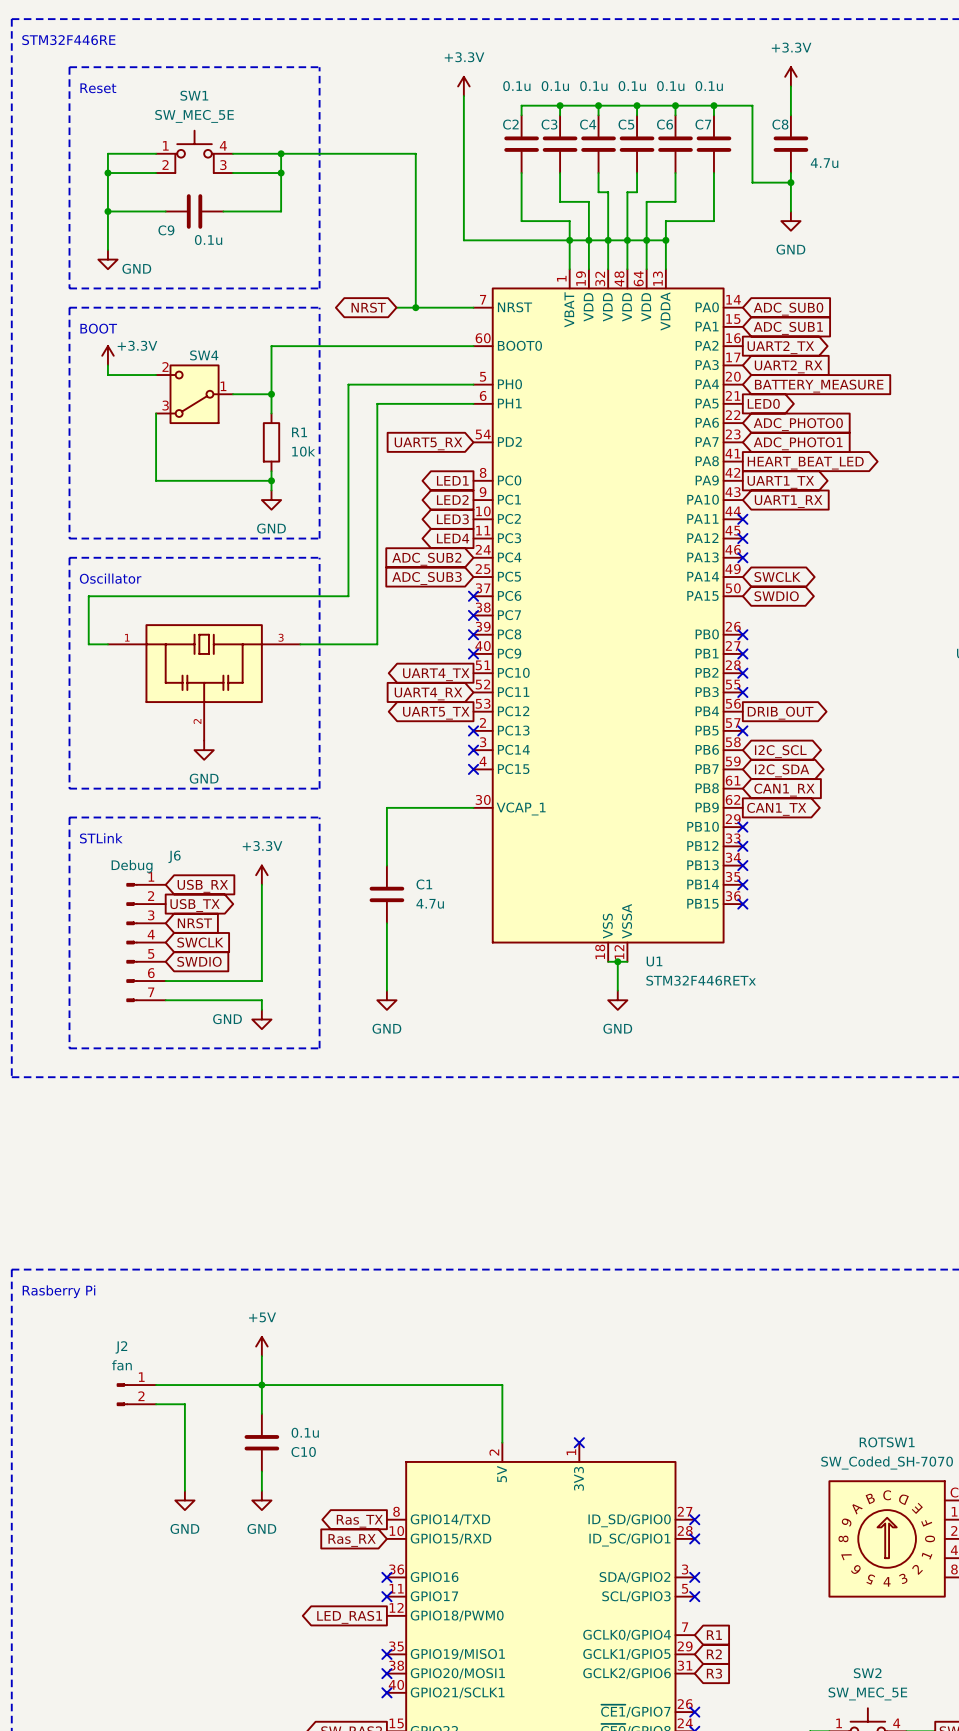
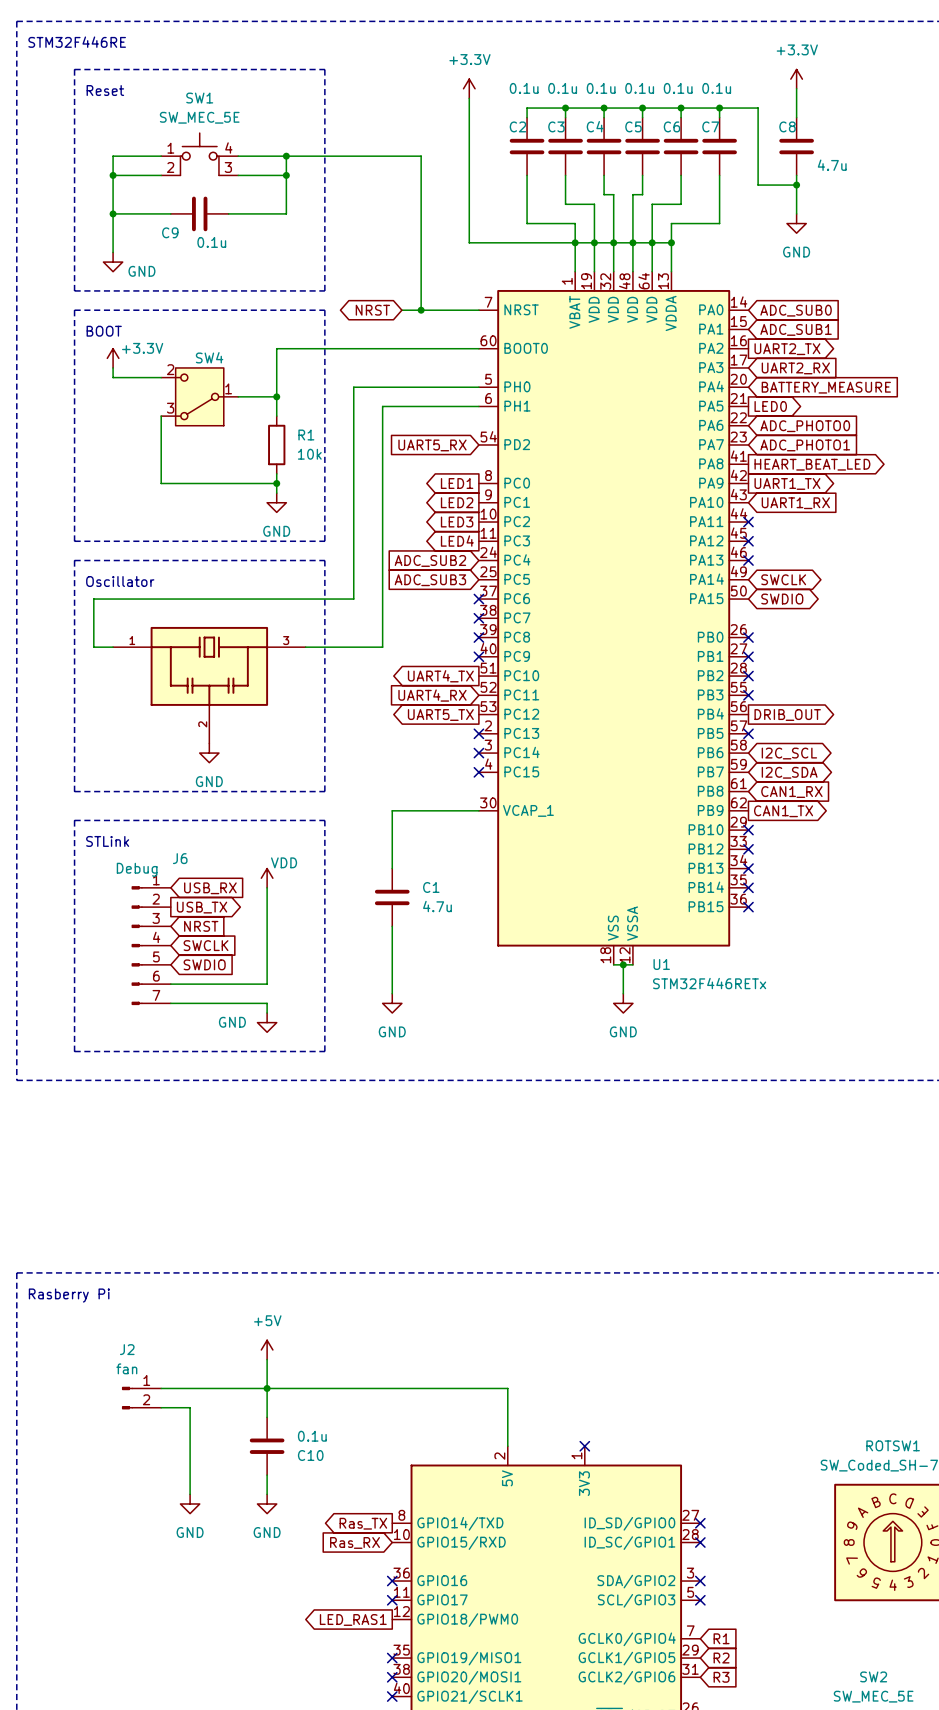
power symbol: +3.3V (261, 875) -> VDD (267, 878)

